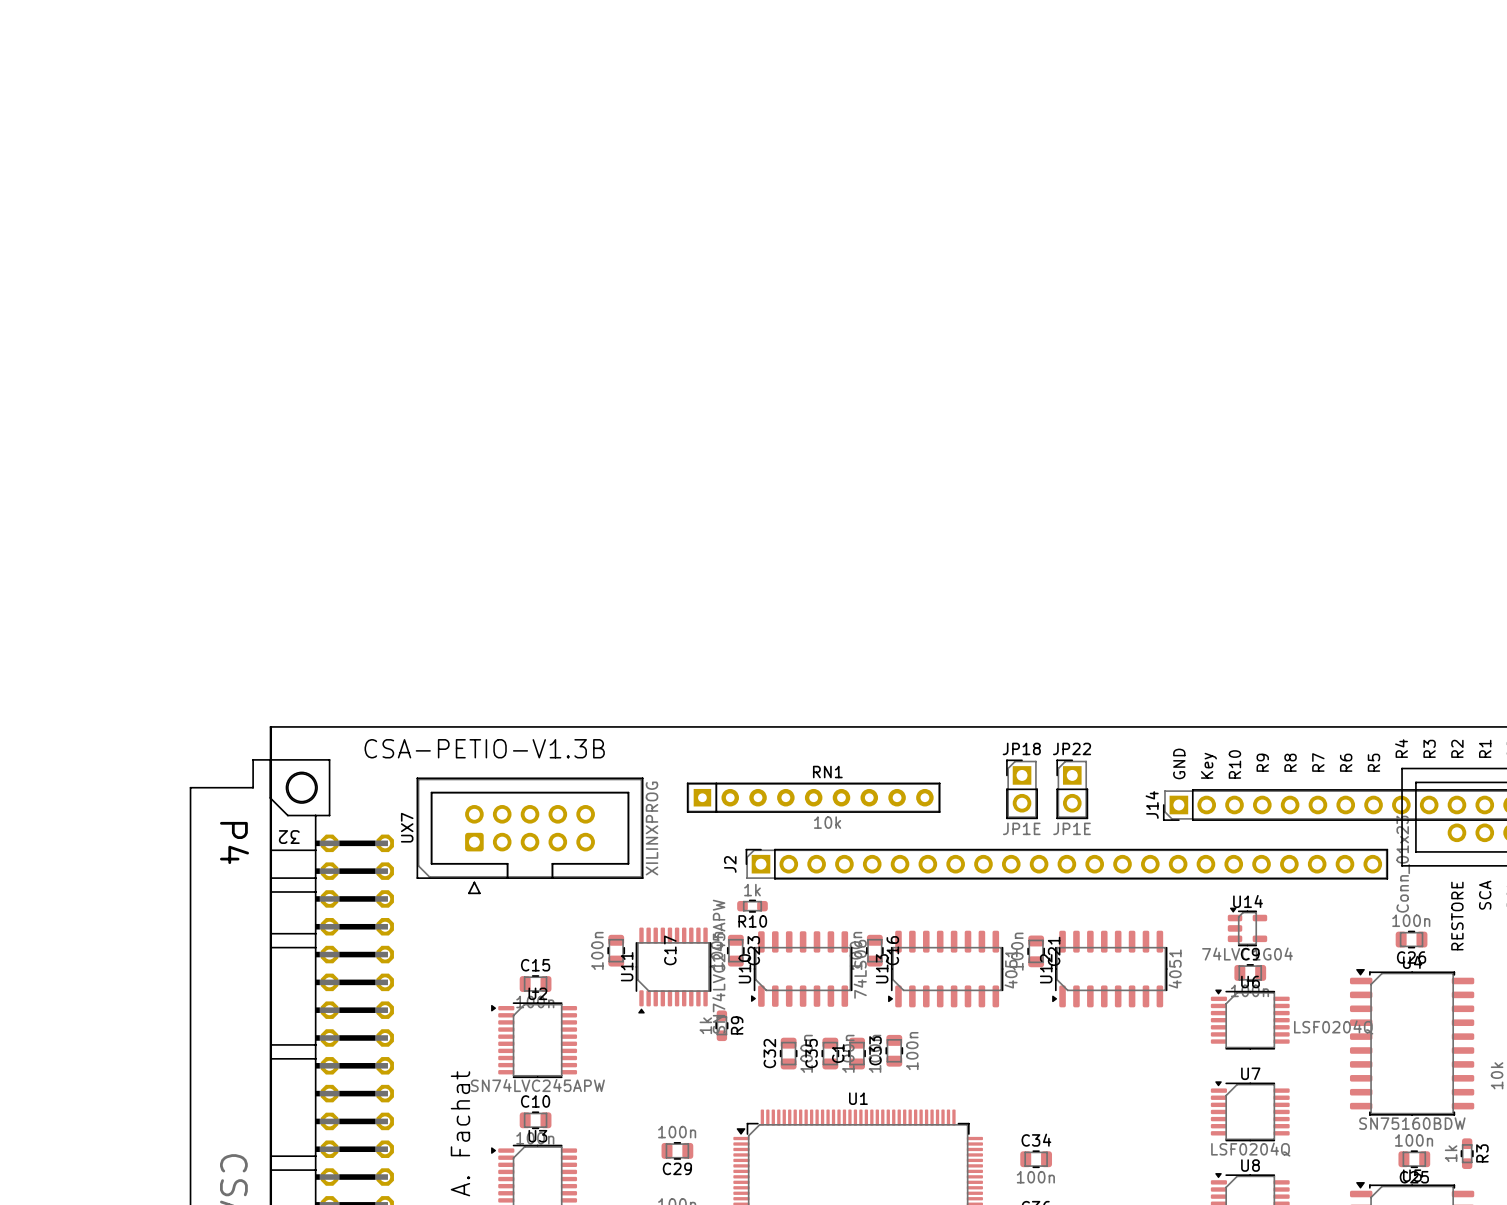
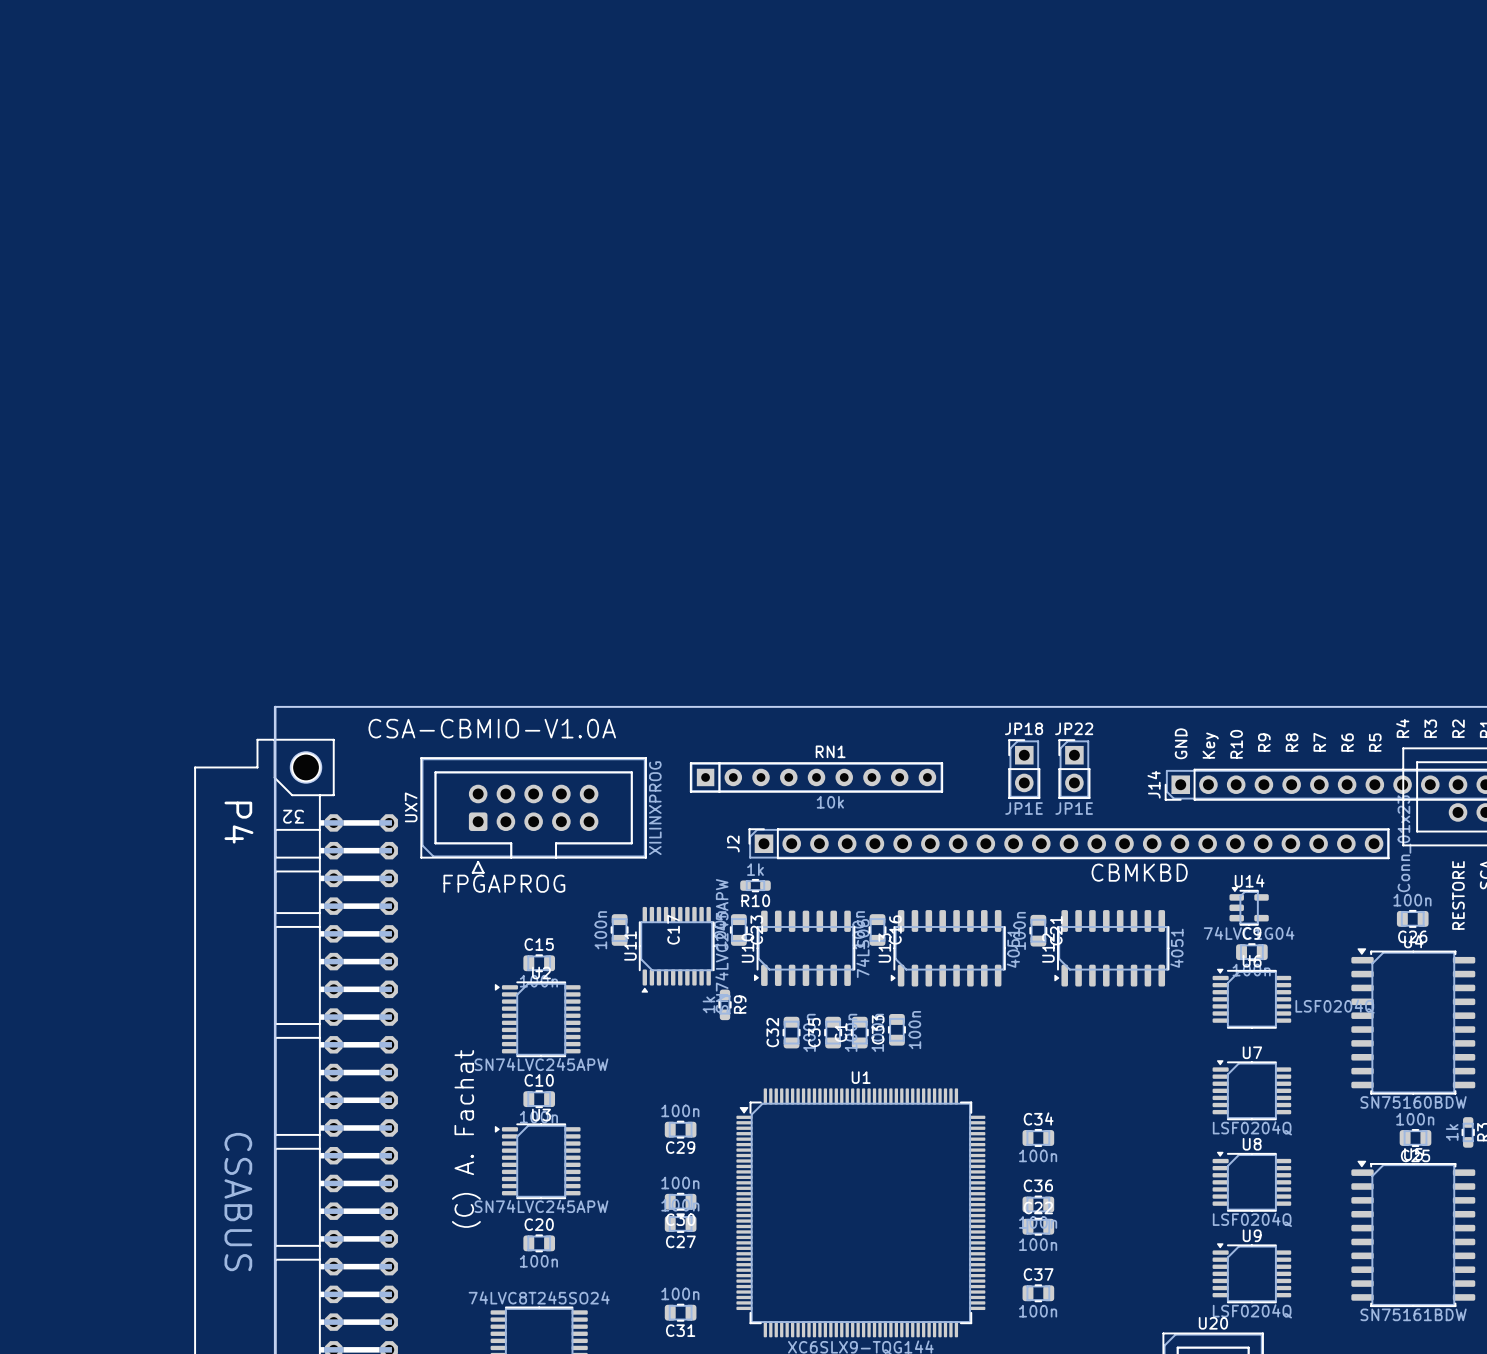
text: CSA-PETIO-V1.3B (484, 748) -> CSA-CBMIO-V1.0A (492, 728)
text: none -> CBMKBD (1139, 872)
text: none -> FPGAPROG (504, 883)

